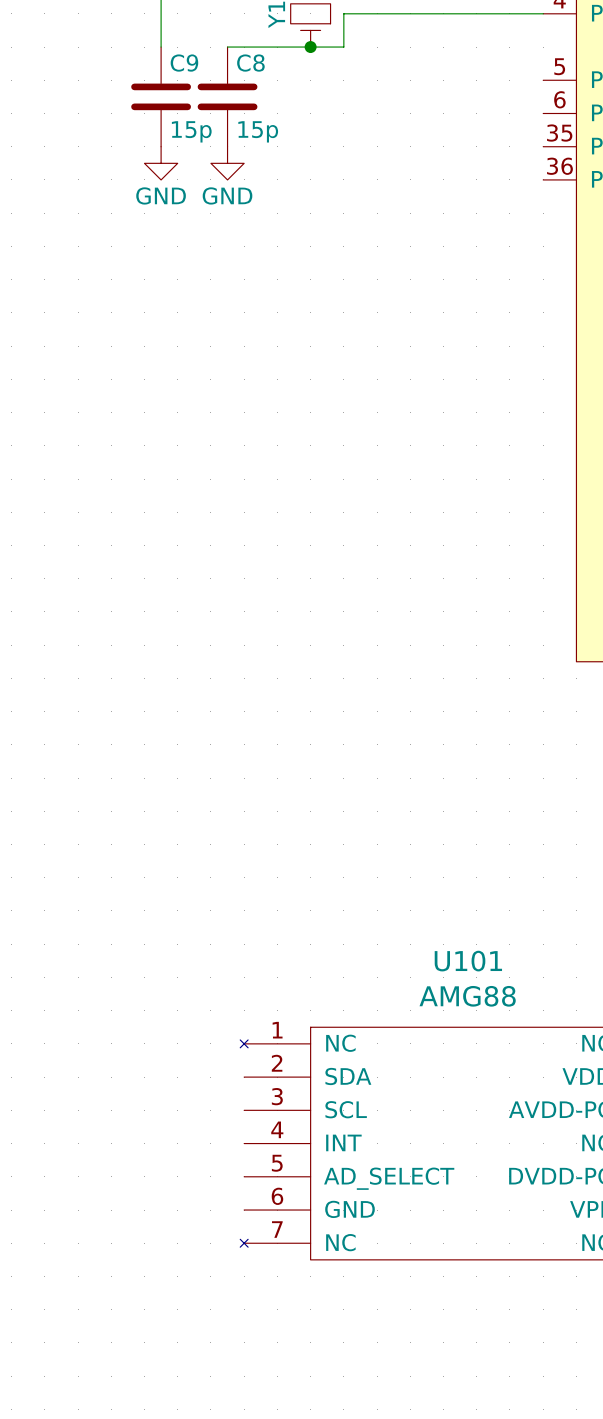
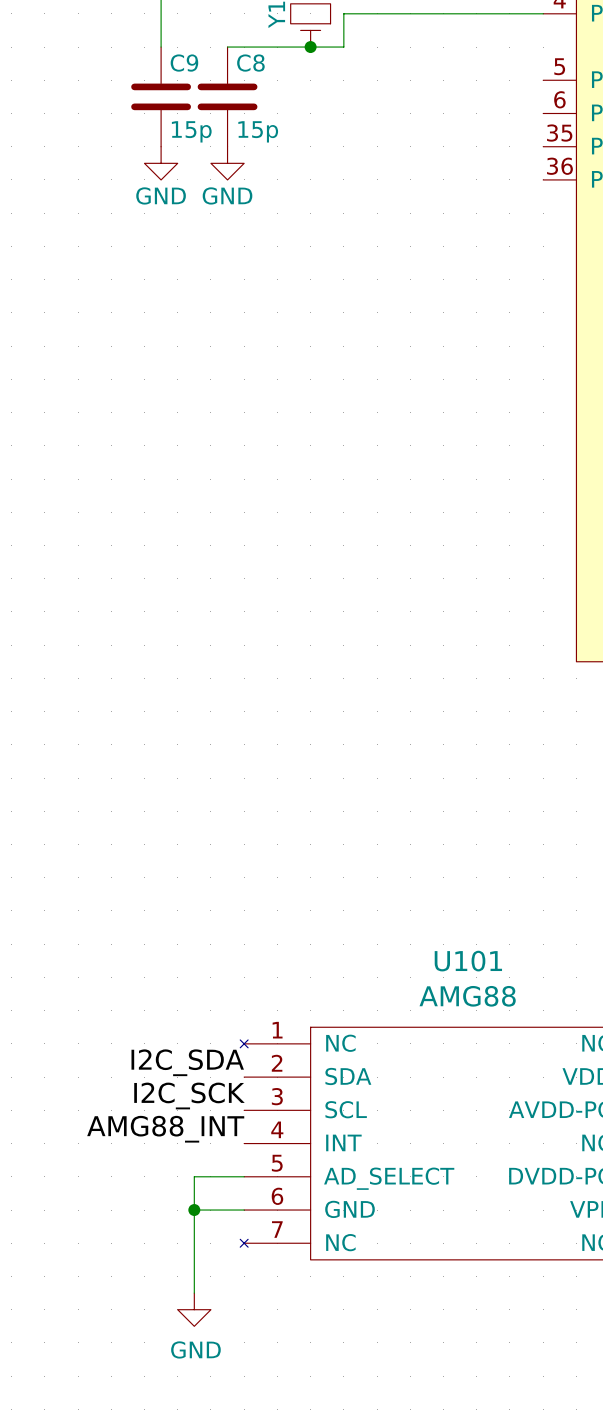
label: none -> I2C_SDA (187, 1062)
label: none -> I2C_SCK (189, 1095)
label: none -> AMG88_INT (165, 1129)
wire: none -> (244, 1176) (194, 1176) (194, 1293)
wire: none -> (194, 1210) (244, 1210)
junction: none -> (194, 1210)
power symbol: none -> GND (194, 1309)

